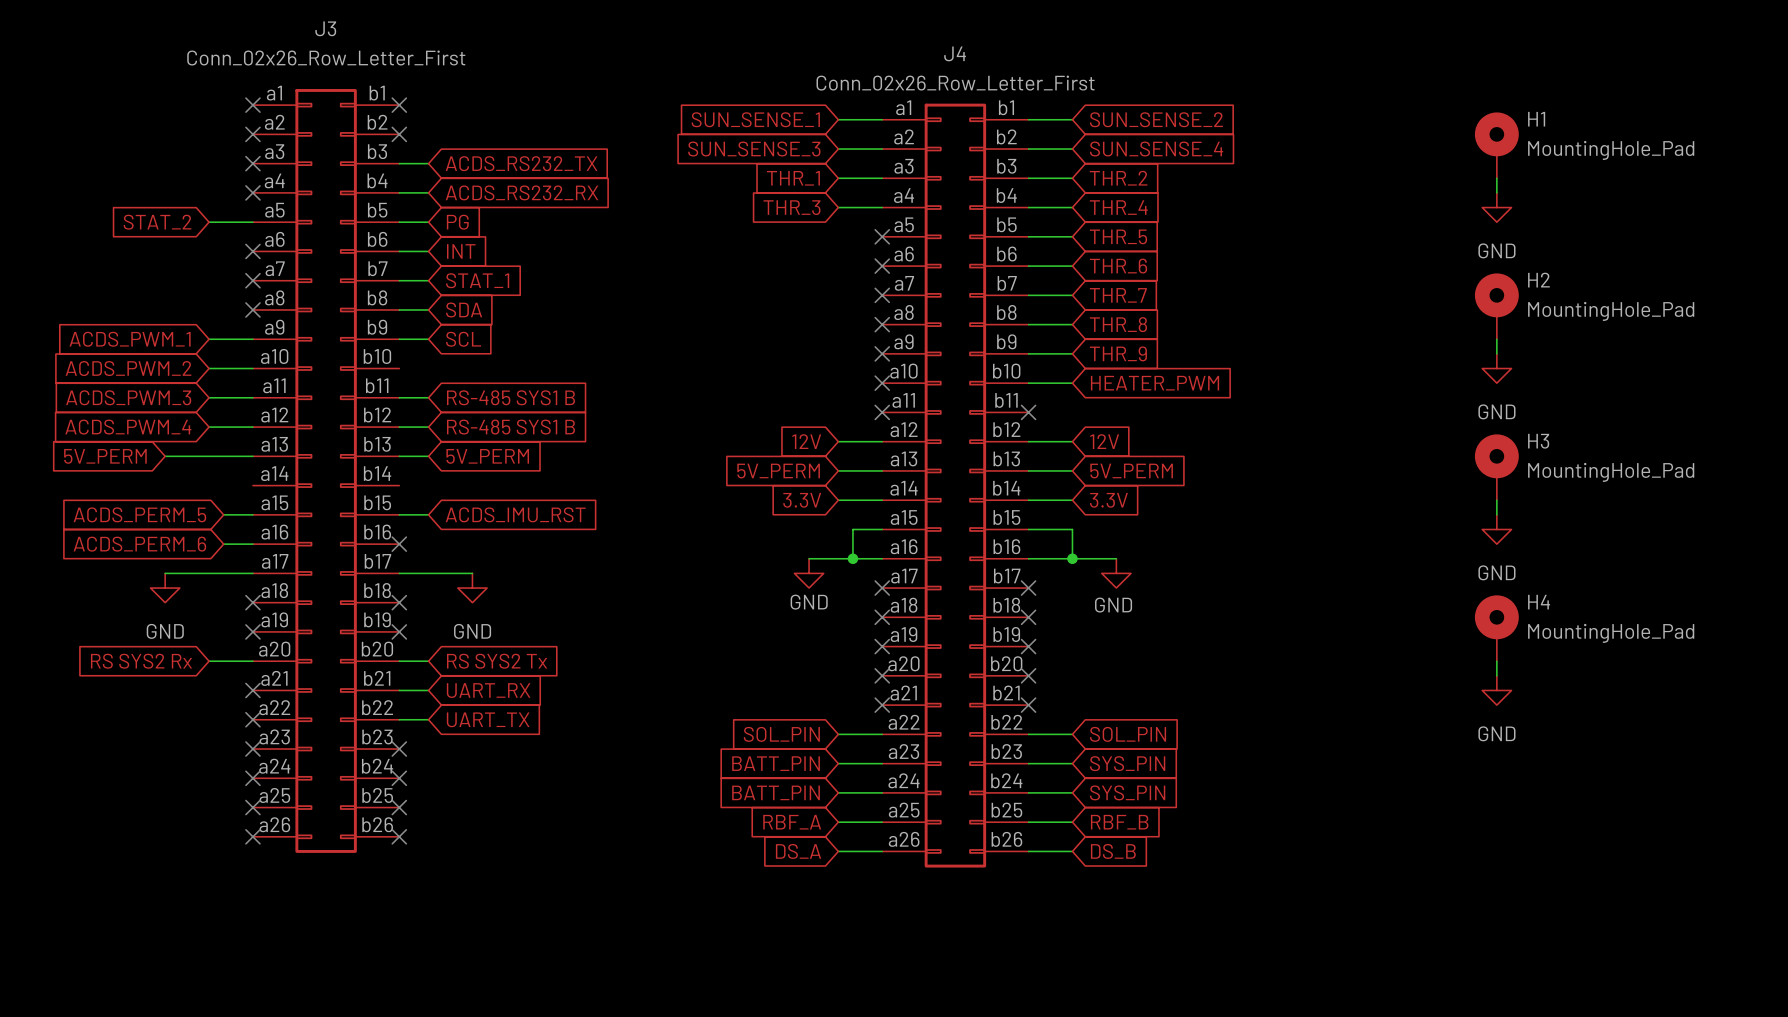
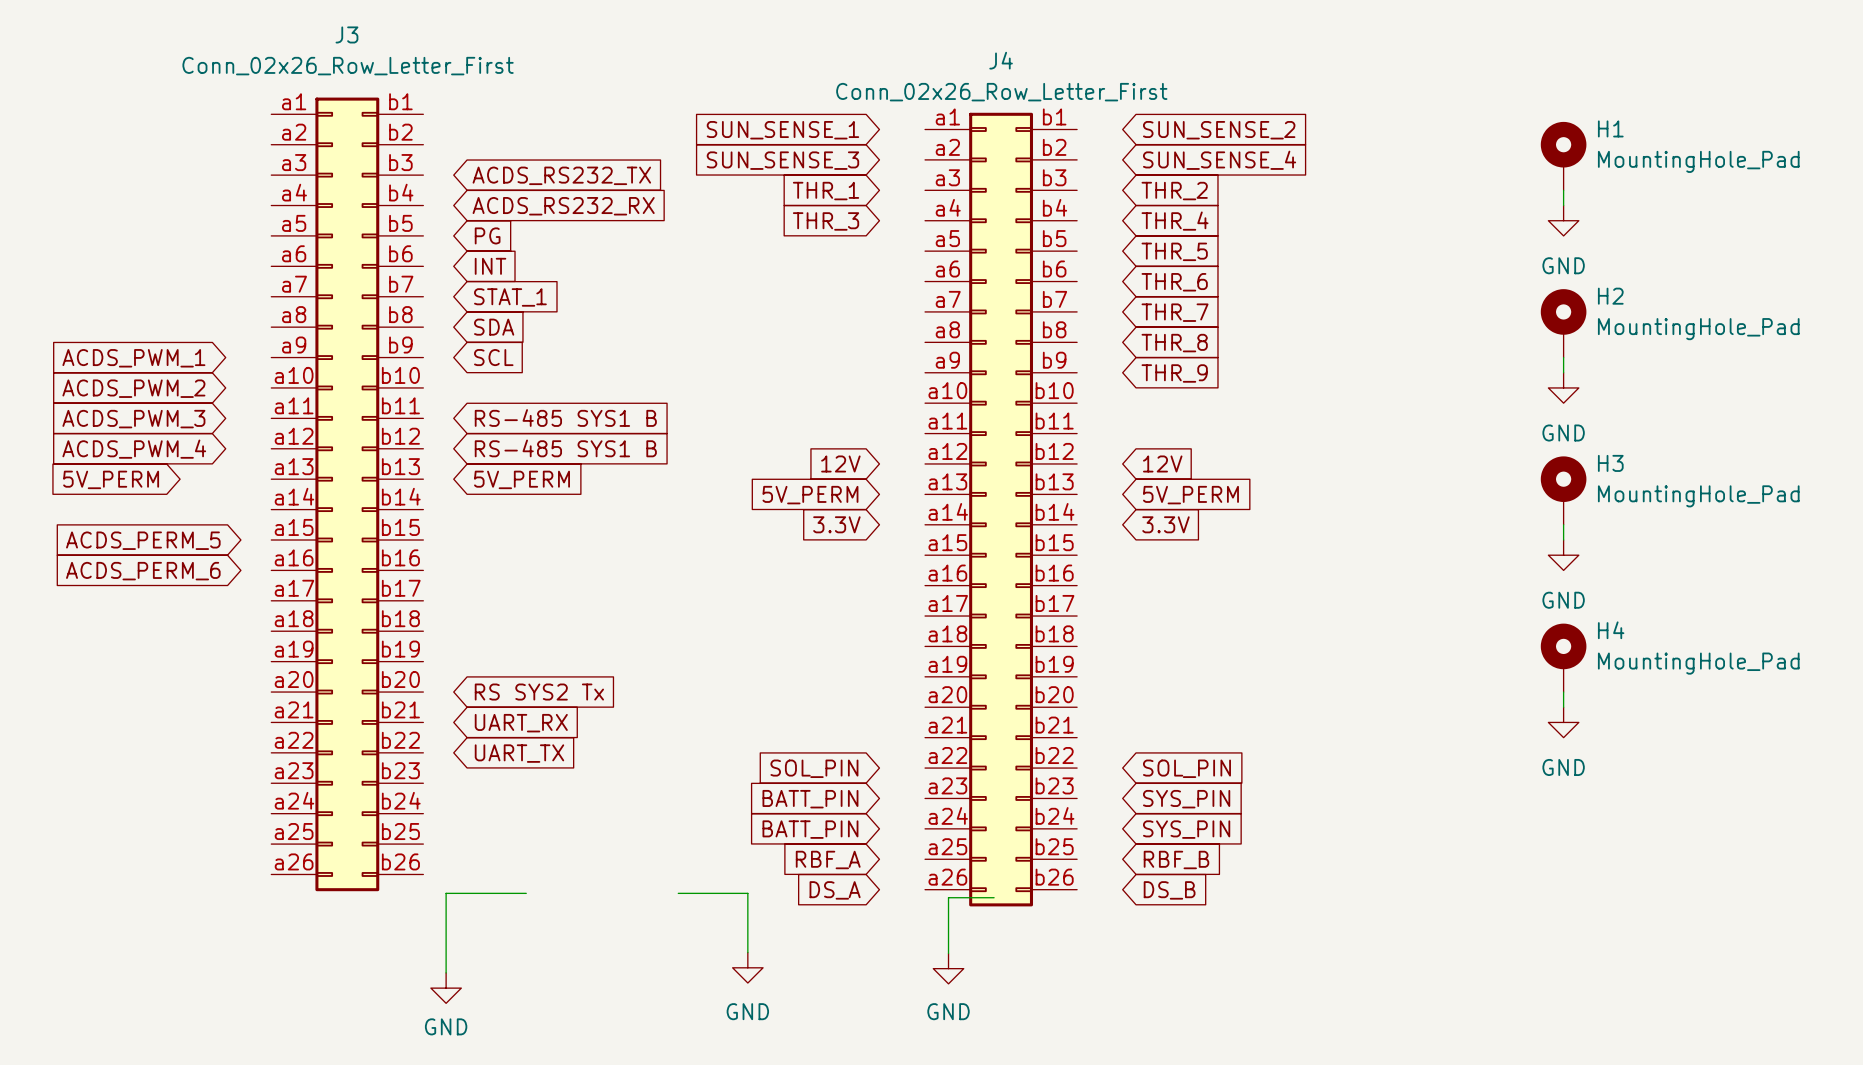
no-connect mark: (252, 105) -> none
no-connect mark: (399, 105) -> none
wire: (838, 119) (882, 119) -> none
wire: (1028, 119) (1072, 119) -> none
no-connect mark: (252, 134) -> none
no-connect mark: (399, 134) -> none
wire: (838, 149) (882, 149) -> none
wire: (1028, 149) (1072, 149) -> none
no-connect mark: (252, 163) -> none
wire: (399, 163) (428, 163) -> none
wire: (838, 178) (882, 178) -> none
wire: (1028, 178) (1072, 178) -> none
no-connect mark: (252, 192) -> none
wire: (399, 192) (428, 192) -> none
wire: (838, 207) (882, 207) -> none
wire: (1028, 207) (1072, 207) -> none
global label: STAT_2 (157, 222) -> none
wire: (209, 222) (252, 222) -> none
wire: (399, 222) (428, 222) -> none
no-connect mark: (882, 236) -> none
wire: (1028, 236) (1072, 236) -> none
no-connect mark: (252, 251) -> none
wire: (399, 251) (428, 251) -> none
no-connect mark: (882, 266) -> none
wire: (1028, 266) (1072, 266) -> none
no-connect mark: (252, 280) -> none
wire: (399, 280) (428, 280) -> none
no-connect mark: (882, 295) -> none
wire: (1028, 295) (1072, 295) -> none
no-connect mark: (252, 309) -> none
wire: (399, 309) (428, 309) -> none
no-connect mark: (882, 324) -> none
wire: (1028, 324) (1072, 324) -> none
wire: (209, 339) (252, 339) -> none
wire: (399, 339) (428, 339) -> none
no-connect mark: (882, 353) -> none
wire: (1028, 353) (1072, 353) -> none
wire: (209, 368) (252, 368) -> none
no-connect mark: (882, 383) -> none
wire: (1028, 383) (1072, 383) -> none
global label: HEATER_PWM (1155, 383) -> none
wire: (209, 397) (252, 397) -> none
wire: (399, 397) (428, 397) -> none
no-connect mark: (882, 412) -> none
no-connect mark: (1028, 412) -> none
wire: (209, 427) (252, 427) -> none
wire: (399, 427) (428, 427) -> none
wire: (838, 441) (882, 441) -> none
wire: (1028, 441) (1072, 441) -> none
wire: (165, 456) (252, 456) -> none
wire: (399, 456) (428, 456) -> none
wire: (838, 470) (882, 470) -> none
wire: (1028, 470) (1072, 470) -> none
wire: (838, 500) (882, 500) -> none
wire: (1028, 500) (1072, 500) -> none
wire: (223, 514) (252, 514) -> none
wire: (399, 514) (428, 514) -> none
global label: ACDS_IMU_RST (515, 514) -> none
wire: (882, 529) (852, 529) (852, 558) -> none
wire: (1028, 529) (1072, 529) (1072, 558) -> none
wire: (223, 544) (252, 544) -> none
no-connect mark: (399, 544) -> none
wire: (809, 558) (882, 558) -> none
junction: (852, 558) -> none
wire: (1028, 558) (1116, 558) -> none
junction: (1072, 558) -> none
wire: (165, 573) (252, 573) -> none
wire: (399, 573) (472, 573) -> none
power symbol: GND (809, 573) -> none
power symbol: GND (1116, 573) -> none
power symbol: GND (165, 588) -> none
power symbol: GND (472, 588) -> none
no-connect mark: (882, 588) -> none
no-connect mark: (1028, 588) -> none
no-connect mark: (252, 602) -> none
no-connect mark: (399, 602) -> none
no-connect mark: (882, 617) -> none
no-connect mark: (1028, 617) -> none
no-connect mark: (252, 631) -> none
no-connect mark: (399, 631) -> none
no-connect mark: (882, 646) -> none
no-connect mark: (1028, 646) -> none
global label: RS SYS2 Rx (141, 661) -> none
wire: (209, 661) (252, 661) -> none
wire: (399, 661) (428, 661) -> none
no-connect mark: (882, 675) -> none
no-connect mark: (1028, 675) -> none
no-connect mark: (252, 690) -> none
wire: (399, 690) (428, 690) -> none
no-connect mark: (882, 705) -> none
no-connect mark: (1028, 705) -> none
no-connect mark: (252, 719) -> none
wire: (399, 719) (428, 719) -> none
wire: (838, 734) (882, 734) -> none
wire: (1028, 734) (1072, 734) -> none
no-connect mark: (252, 749) -> none
no-connect mark: (399, 749) -> none
wire: (838, 763) (882, 763) -> none
wire: (1028, 763) (1072, 763) -> none
no-connect mark: (252, 778) -> none
no-connect mark: (399, 778) -> none
wire: (838, 792) (882, 792) -> none
wire: (1028, 792) (1072, 792) -> none
no-connect mark: (252, 807) -> none
no-connect mark: (399, 807) -> none
wire: (838, 822) (882, 822) -> none
wire: (1028, 822) (1072, 822) -> none
no-connect mark: (252, 836) -> none
no-connect mark: (399, 836) -> none
wire: (838, 851) (882, 851) -> none
wire: (1028, 851) (1072, 851) -> none
wire: none -> (526, 893) (446, 893) (446, 972)
wire: none -> (678, 893) (747, 893) (747, 952)
wire: none -> (994, 897) (948, 897) (948, 953)
power symbol: none -> GND (747, 967)
power symbol: none -> GND (948, 968)
power symbol: none -> GND (446, 988)

